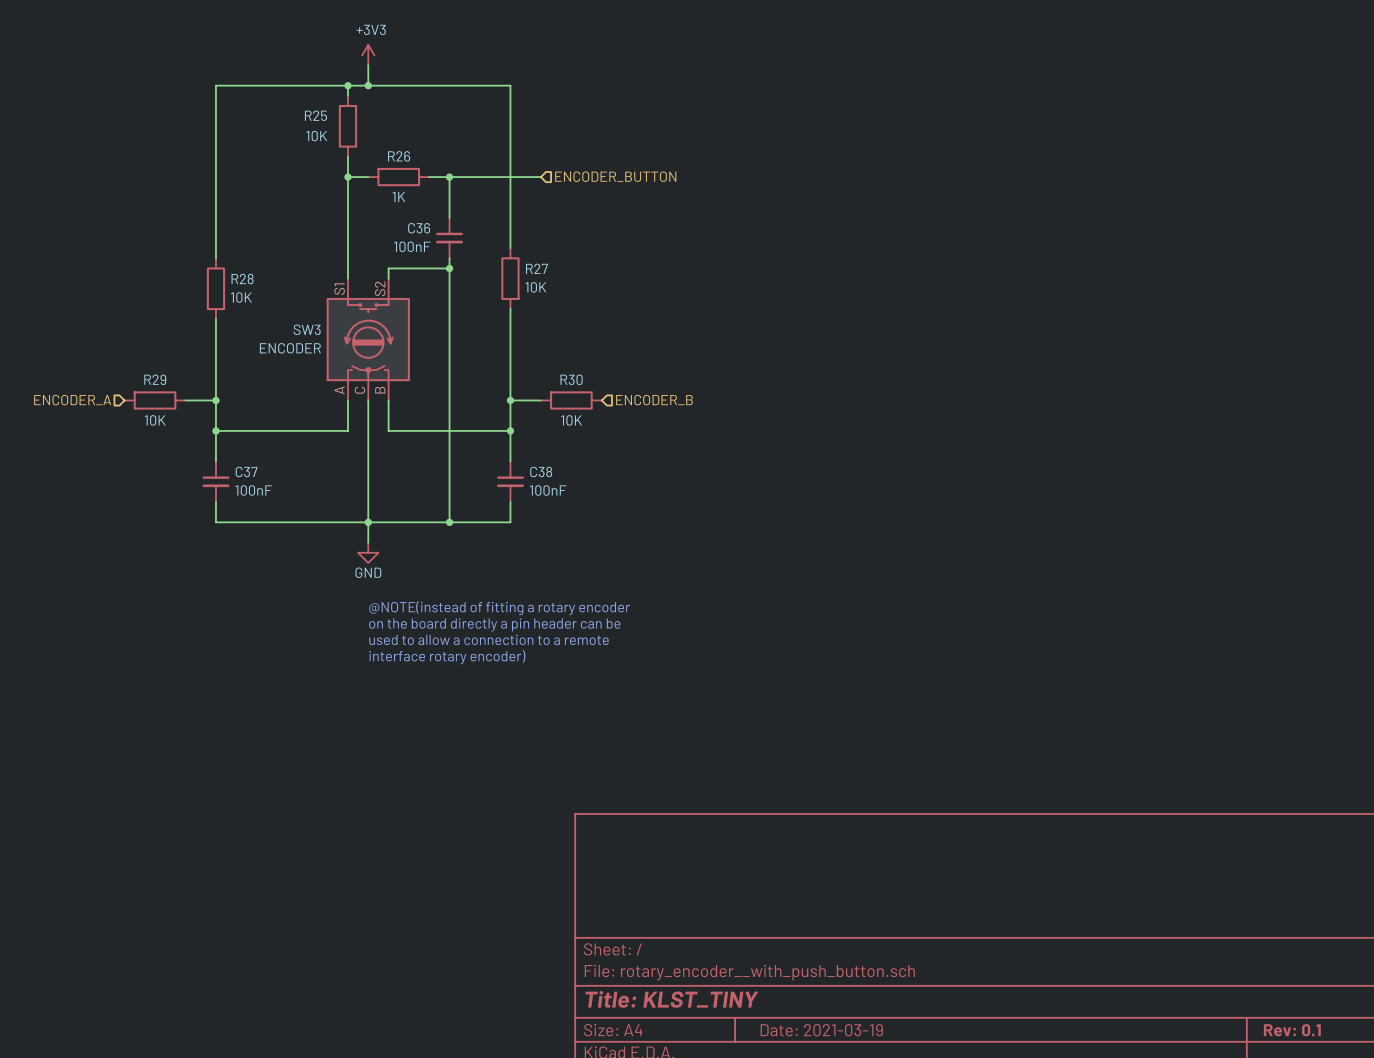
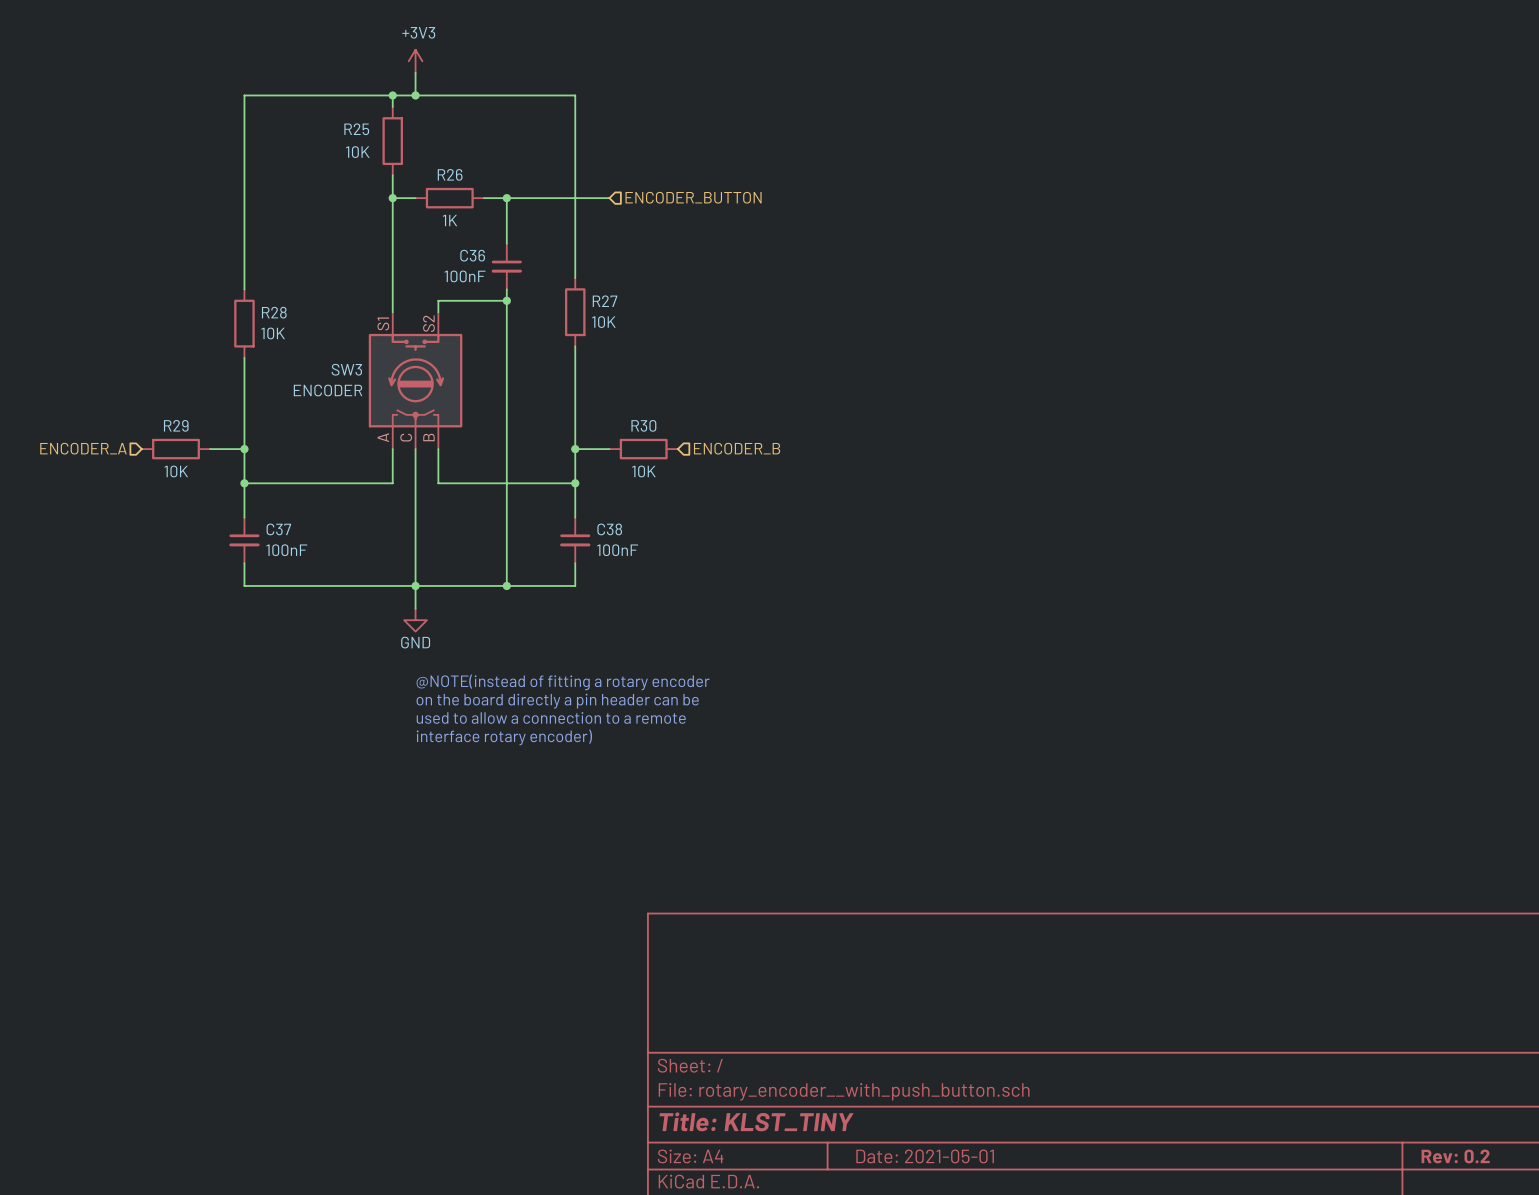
title block: Date: 2021-03-19 (821, 1030) -> Date: 2021-05-01 (925, 1156)
title block: Rev: 0.1 (1292, 1030) -> Rev: 0.2 (1455, 1156)

